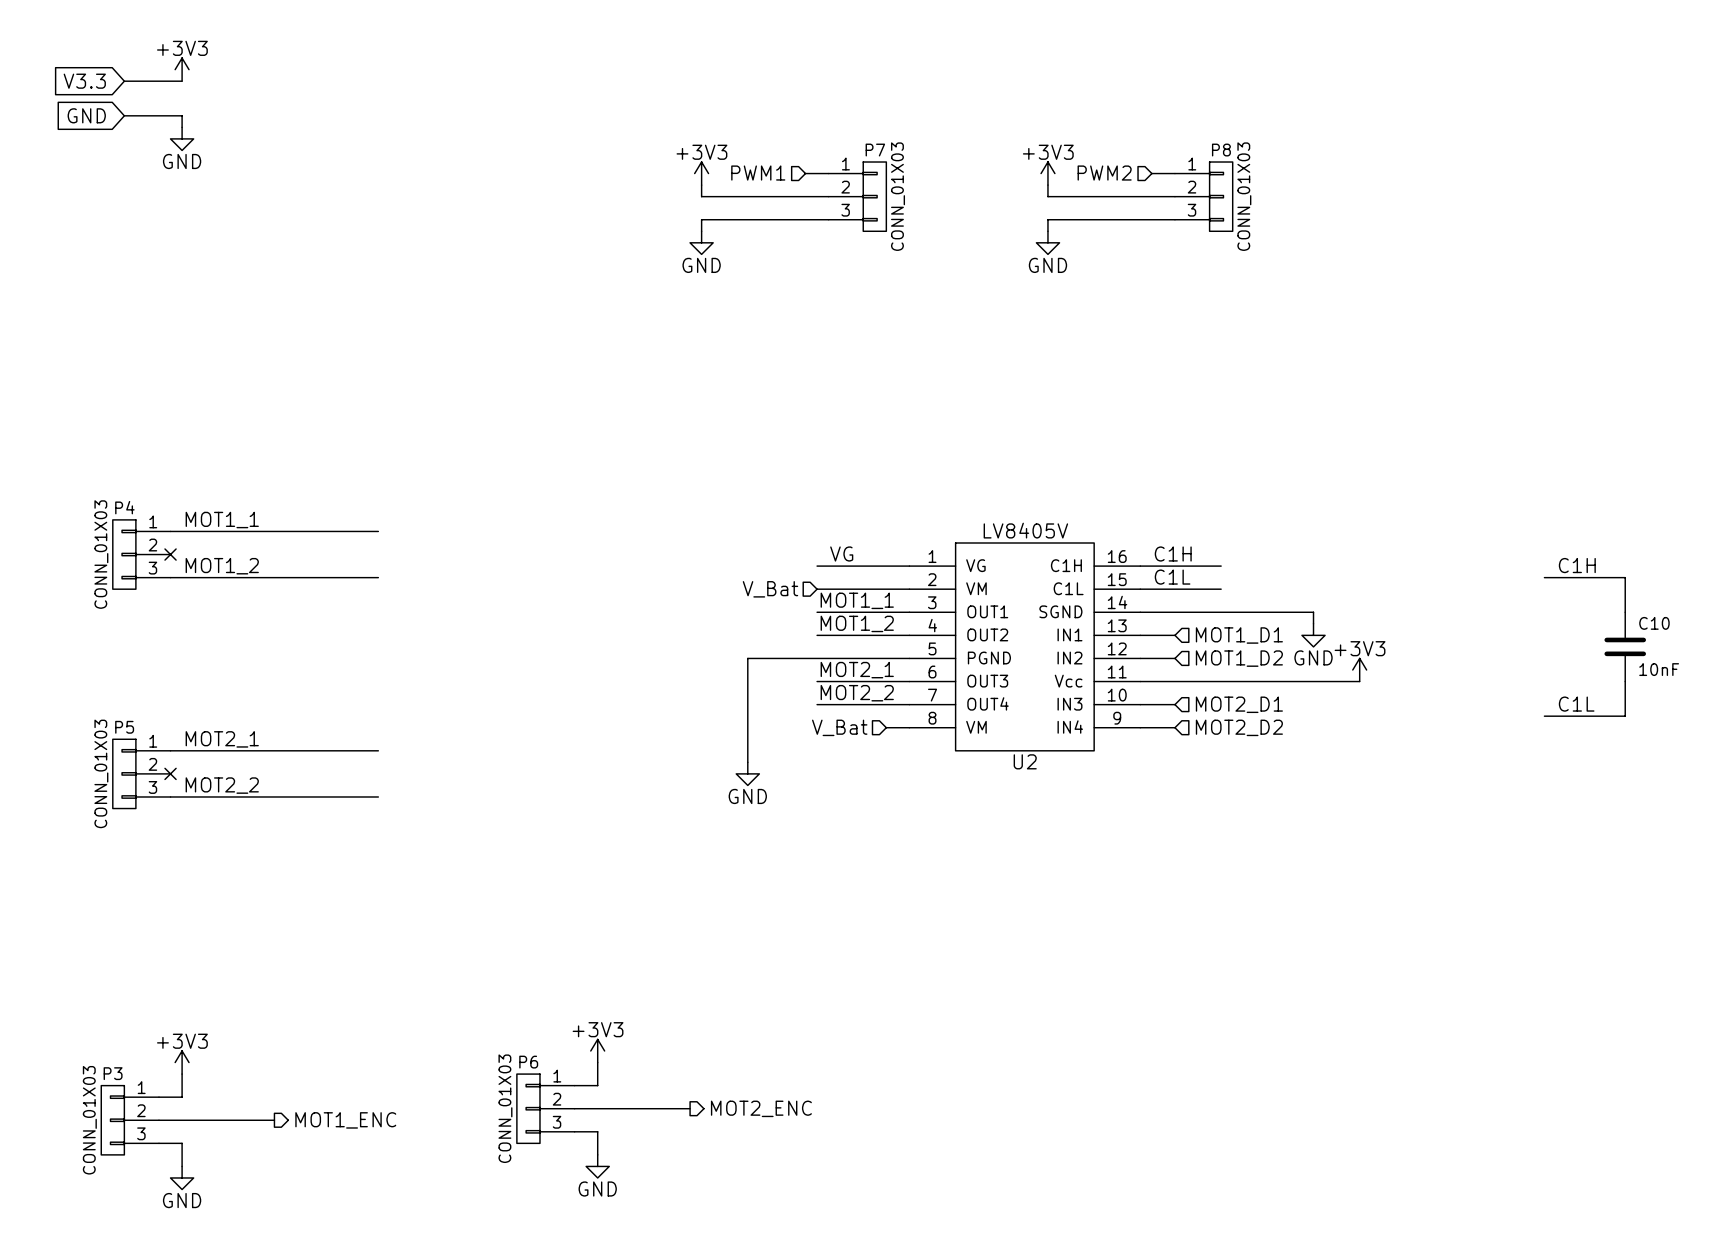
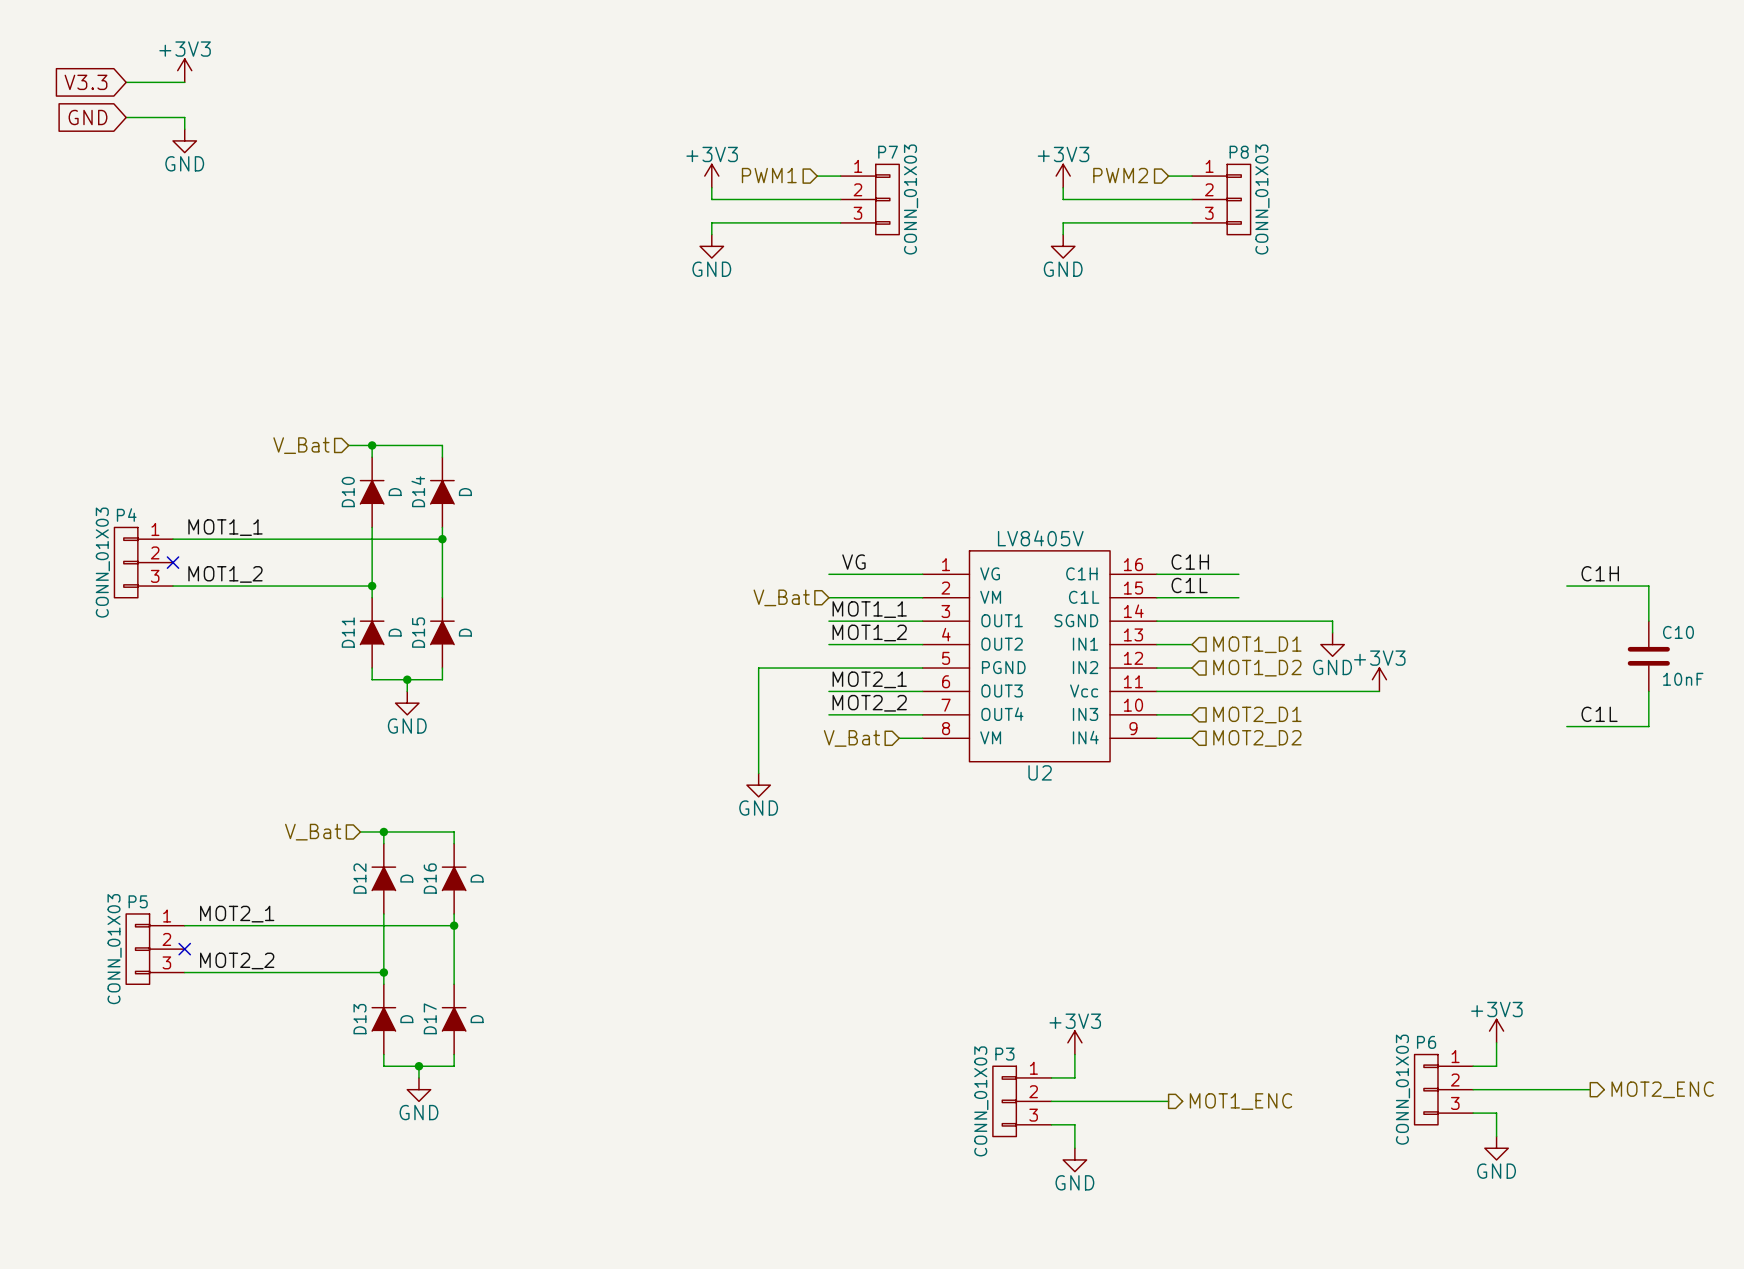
hierarchical label: none -> V_Bat (301, 445)
wire: none -> (348, 445) (442, 445) (442, 457)
wire: none -> (372, 445) (372, 457)
junction: none -> (372, 445)
D10: none -> D (372, 492)
D14: none -> D (442, 492)
wire: none -> (372, 527) (372, 597)
wire: none -> (442, 527) (442, 597)
wire: none -> (383, 539) (442, 539)
junction: none -> (442, 539)
wire: (366, 577) (378, 577) -> none
junction: none -> (372, 586)
D11: none -> D (372, 632)
D15: none -> D (442, 632)
wire: none -> (372, 668) (372, 679) (442, 679) (442, 668)
wire: none -> (407, 679) (407, 691)
junction: none -> (407, 679)
power symbol: none -> GND (407, 703)
label position: MOT2_1 (222, 739) -> MOT2_1 (237, 914)
wire: (170, 750) (378, 750) -> none
P5 position: (141, 773) -> (155, 949)
no-connect mark: (170, 773) -> none
label position: MOT2_2 (222, 785) -> MOT2_2 (237, 960)
wire: (170, 796) (378, 796) -> none
hierarchical label: none -> V_Bat (313, 832)
wire: none -> (360, 831) (454, 831) (454, 843)
wire: none -> (383, 831) (383, 843)
junction: none -> (383, 831)
D12: none -> D (383, 878)
D16: none -> D (454, 878)
wire: none -> (383, 913) (383, 984)
wire: none -> (454, 913) (454, 984)
wire: none -> (184, 925) (454, 925)
junction: none -> (454, 925)
no-connect mark: none -> (184, 949)
wire: none -> (184, 972) (383, 972)
junction: none -> (383, 972)
D13: none -> D (383, 1019)
D17: none -> D (454, 1019)
power symbol: none -> +3V3 (1496, 1031)
power symbol: none -> +3V3 (1074, 1042)
wire: none -> (1496, 1042) (1496, 1066) (1473, 1066)
wire: none -> (383, 1054) (383, 1066) (454, 1066) (454, 1054)
wire: none -> (1074, 1054) (1074, 1077) (1051, 1077)
wire: none -> (418, 1066) (418, 1077)
junction: none -> (418, 1066)
power symbol: +3V3 (597, 1050) -> none
power symbol: +3V3 (182, 1062) -> none
wire: (597, 1062) (597, 1085) (574, 1085) -> none
wire: (182, 1074) (182, 1097) (158, 1097) -> none
power symbol: none -> GND (418, 1089)
wire: none -> (1473, 1089) (1590, 1089)
hierarchical label: none -> MOT2_ENC (1662, 1089)
wire: none -> (1051, 1101) (1168, 1101)
hierarchical label: none -> MOT1_ENC (1240, 1101)
wire: none -> (1473, 1113) (1496, 1113) (1496, 1136)
P6 position: (545, 1108) -> (1443, 1089)
wire: (574, 1108) (690, 1108) -> none
hierarchical label: MOT2_ENC (761, 1108) -> none
wire: none -> (1051, 1124) (1074, 1124) (1074, 1148)
P3 position: (130, 1120) -> (1022, 1101)
wire: (158, 1120) (274, 1120) -> none
hierarchical label: MOT1_ENC (345, 1120) -> none
wire: (574, 1131) (597, 1131) (597, 1154) -> none
power symbol: none -> GND (1496, 1148)
wire: (158, 1143) (182, 1143) (182, 1166) -> none
power symbol: none -> GND (1074, 1159)
power symbol: GND (597, 1166) -> none
power symbol: GND (182, 1177) -> none

